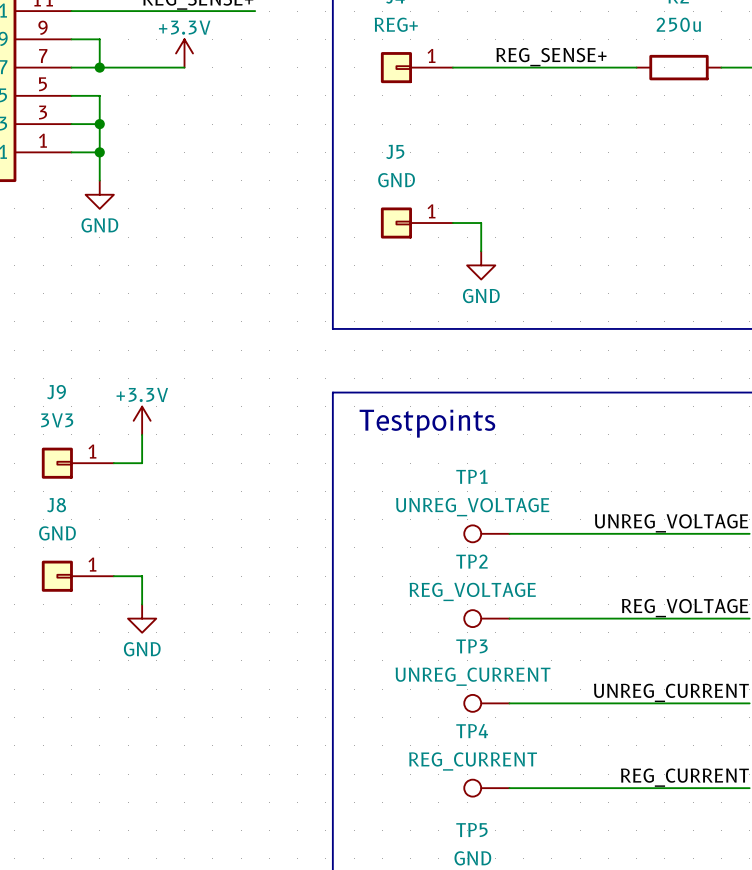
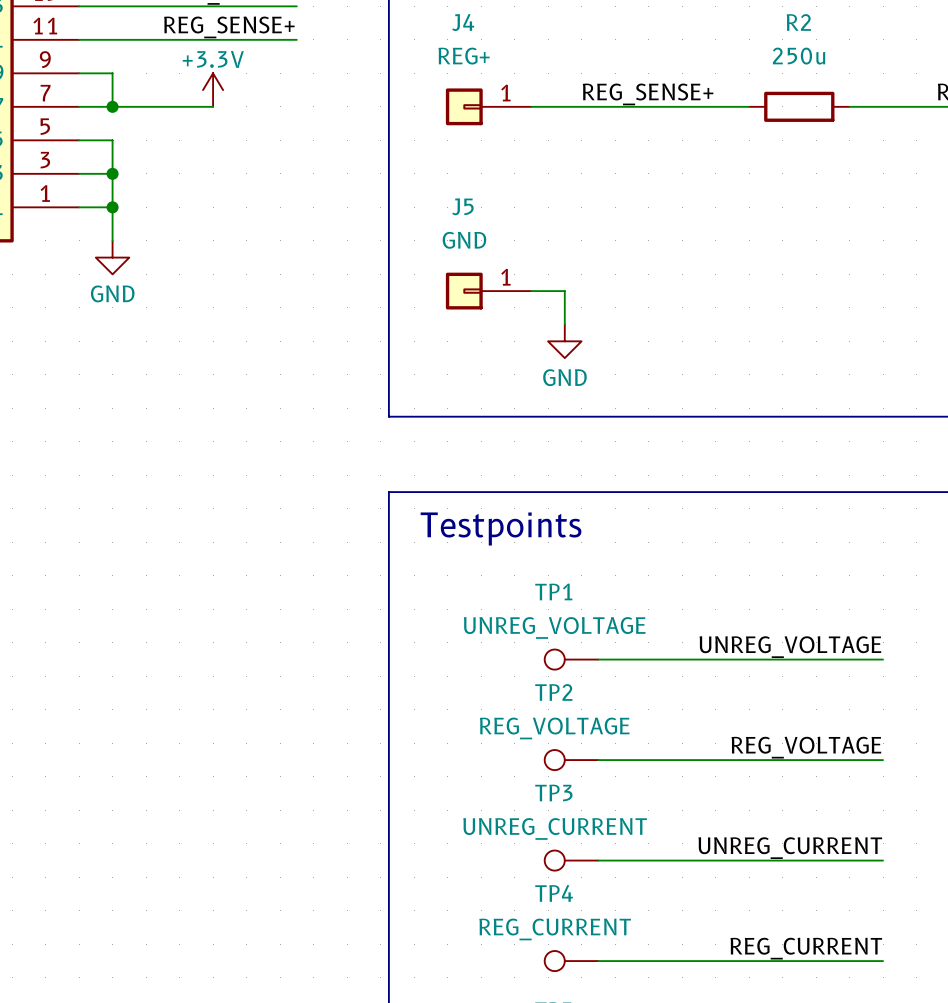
power symbol: +3.3V (142, 420) -> none
wire: (142, 434) (142, 463) (113, 463) -> none
J9: 3V3 (77, 463) -> none
J8: GND (77, 576) -> none
wire: (113, 576) (142, 576) (142, 604) -> none
power symbol: GND (142, 618) -> none

